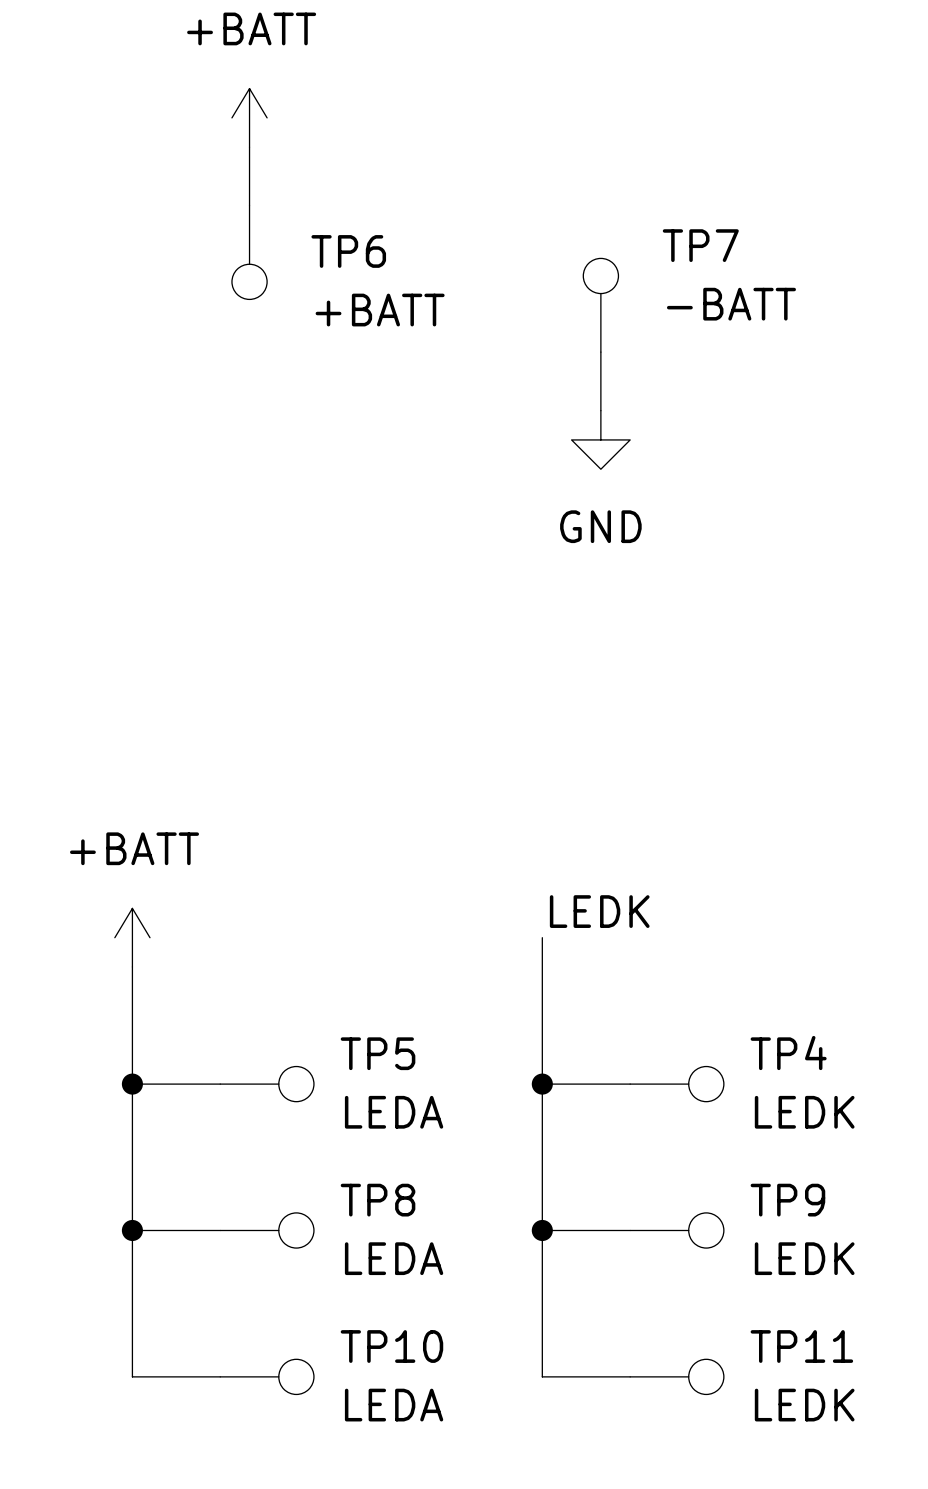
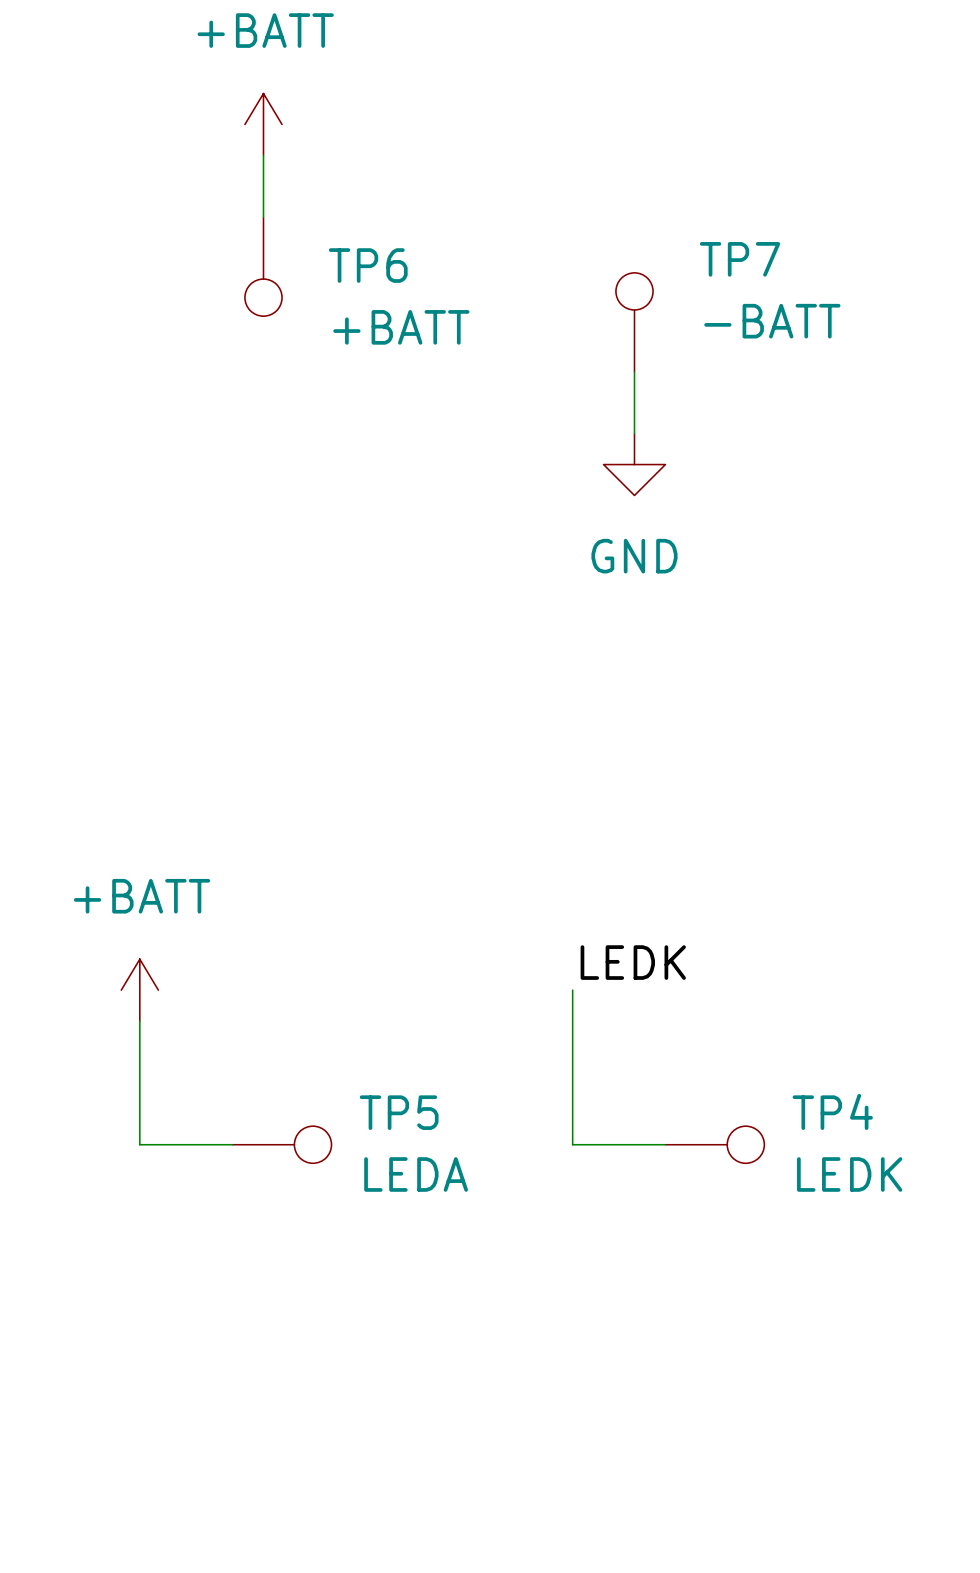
wire: (132, 1084) (132, 1376) (220, 1376) -> none
junction: (132, 1084) -> none
wire: (542, 1084) (542, 1376) (630, 1376) -> none
junction: (542, 1084) -> none
wire: (132, 1230) (220, 1230) -> none
junction: (132, 1230) -> none
TP8: LEDA (267, 1230) -> none
wire: (542, 1230) (630, 1230) -> none
junction: (542, 1230) -> none
TP9: LEDK (677, 1230) -> none
TP10: LEDA (267, 1376) -> none
TP11: LEDK (677, 1376) -> none

